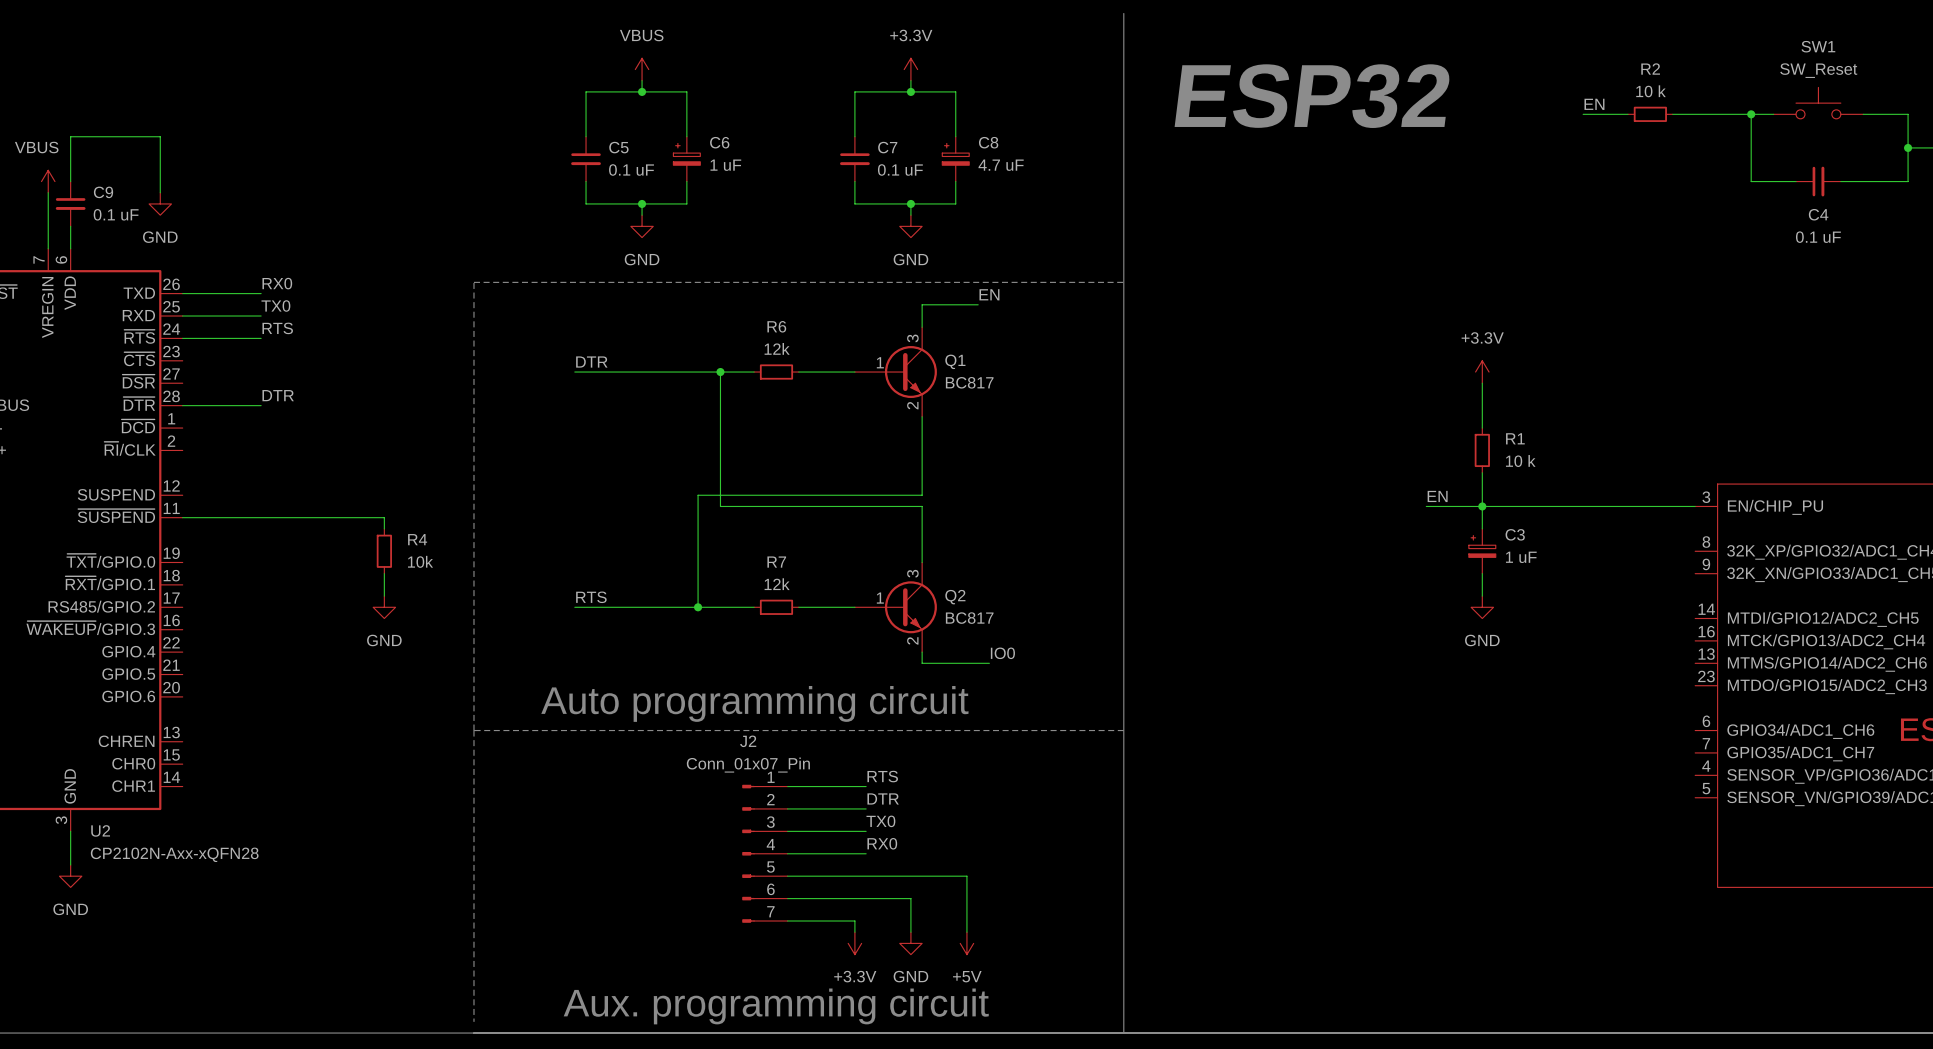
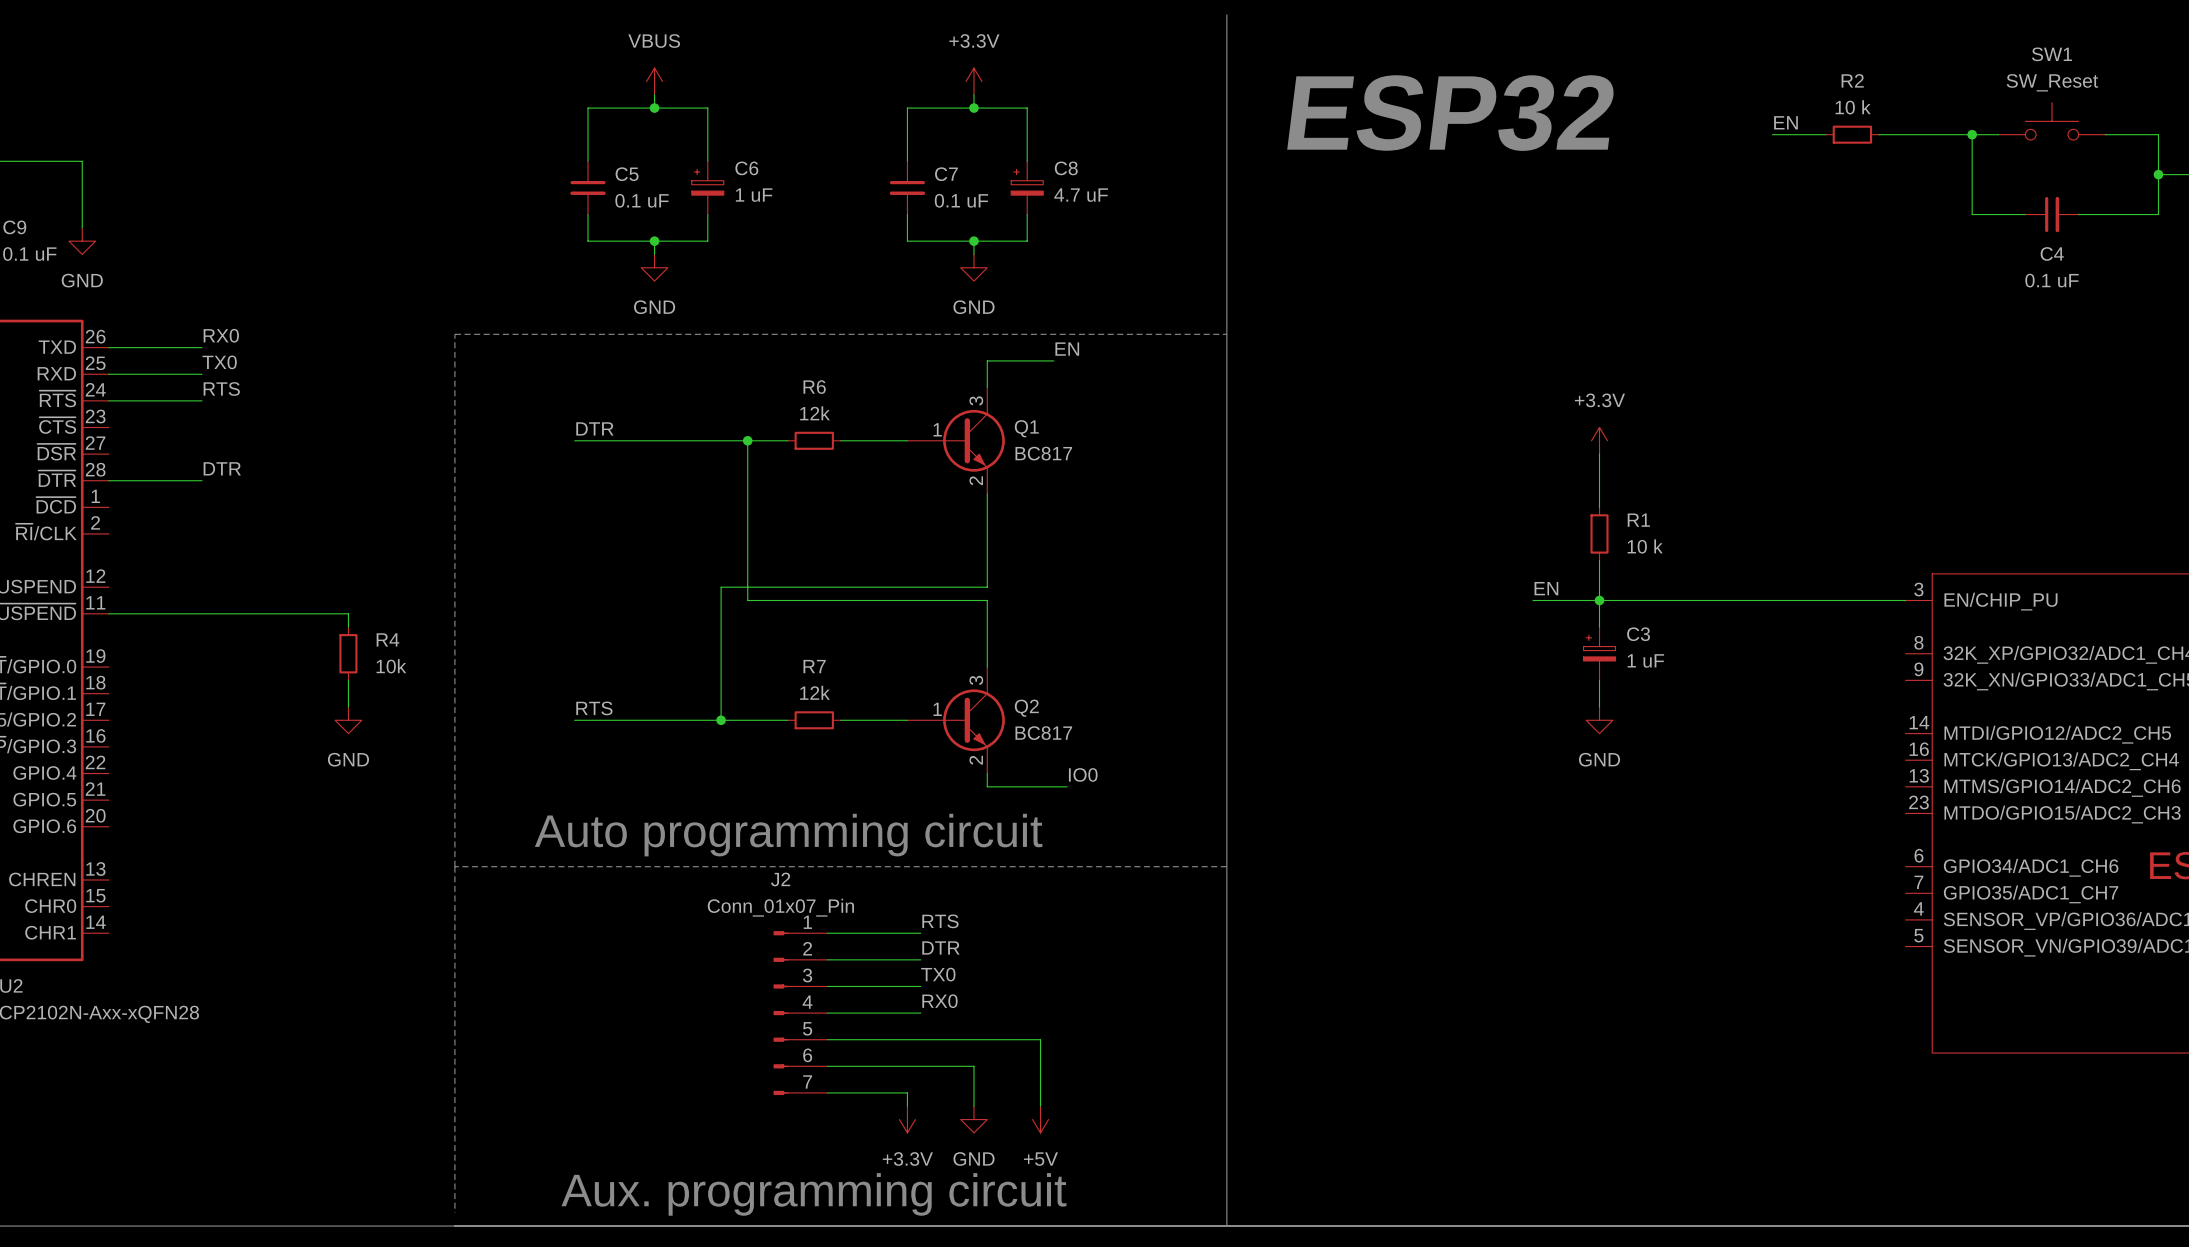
power symbol position: +3.3V (1482, 372) -> +3.3V (1599, 440)
wire: (1482, 383) (1482, 428) -> (1599, 454) (1599, 507)
R1 position: (1482, 450) -> (1599, 533)
wire: (1482, 472) (1482, 528) -> (1599, 560) (1599, 627)
label position: EN (1437, 496) -> EN (1546, 588)
wire: none -> (1532, 600) (1586, 600)
junction position: (1482, 506) -> (1599, 600)
C3 position: (1482, 551) -> (1599, 653)
wire: (1482, 573) (1482, 596) -> (1599, 680) (1599, 706)
power symbol position: GND (1482, 607) -> GND (1599, 720)

